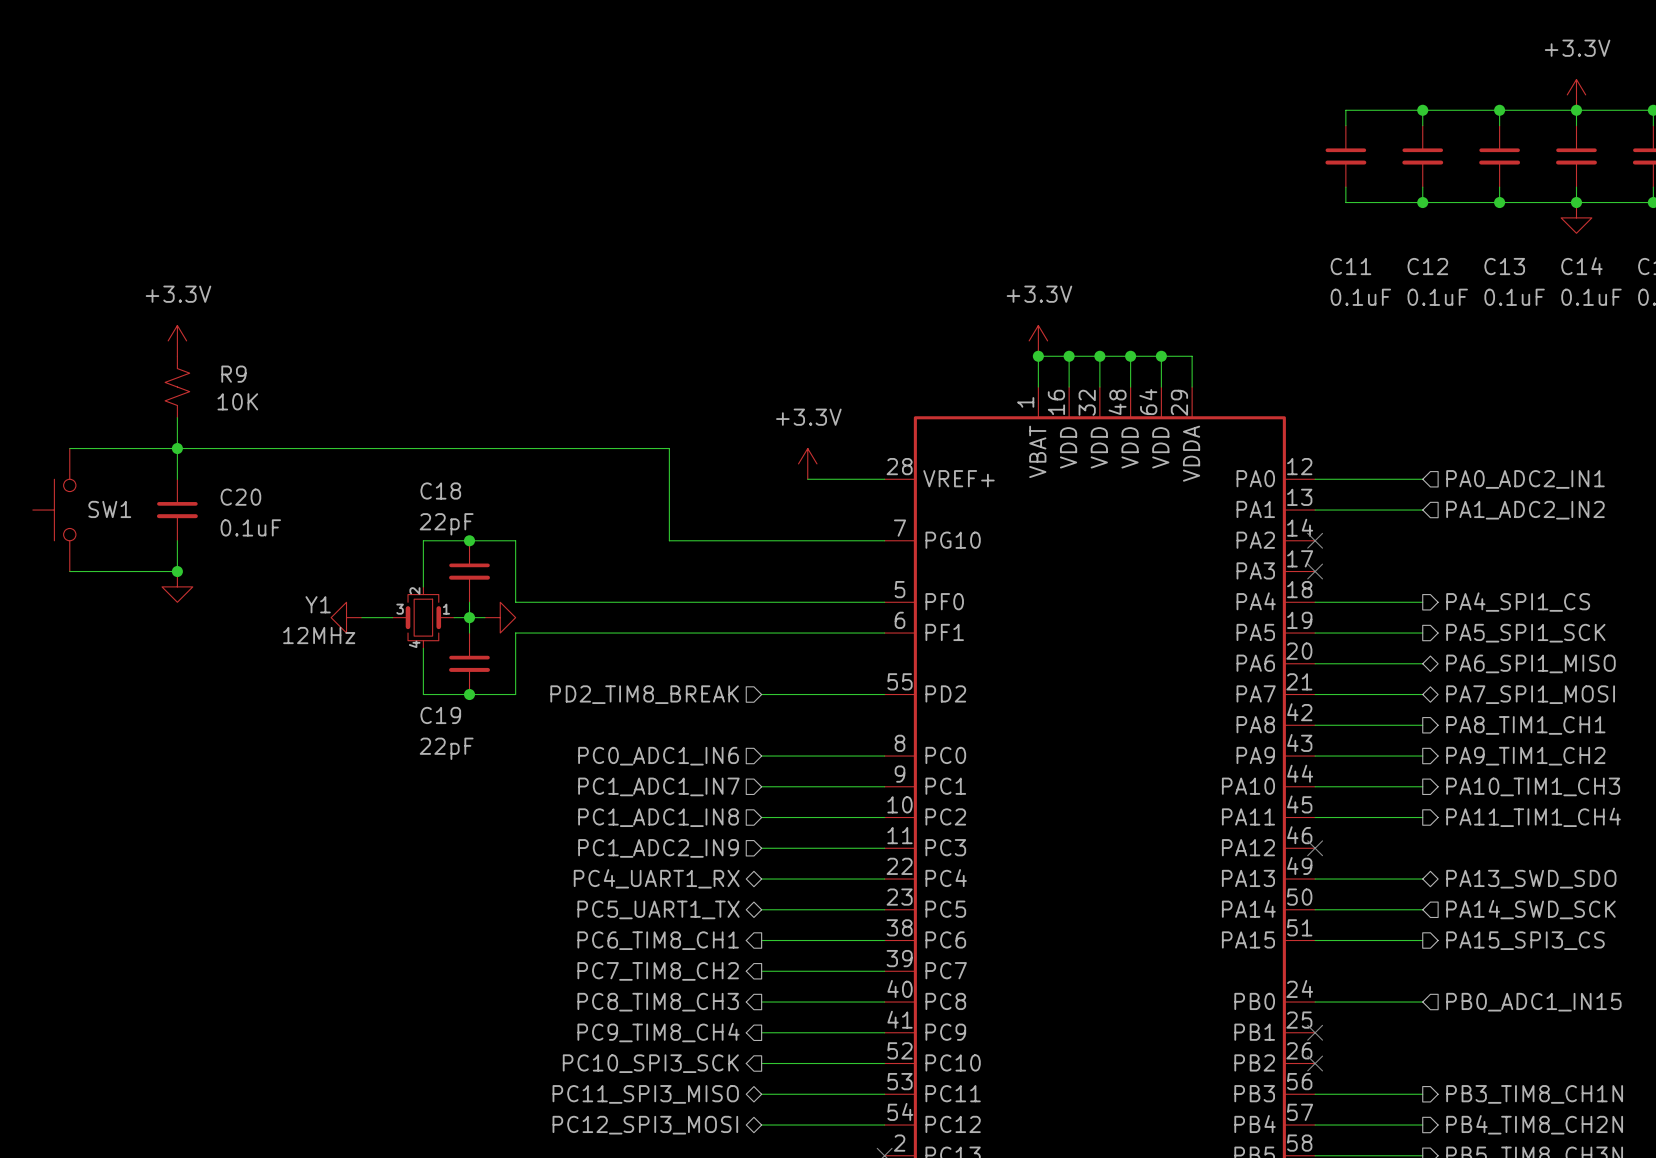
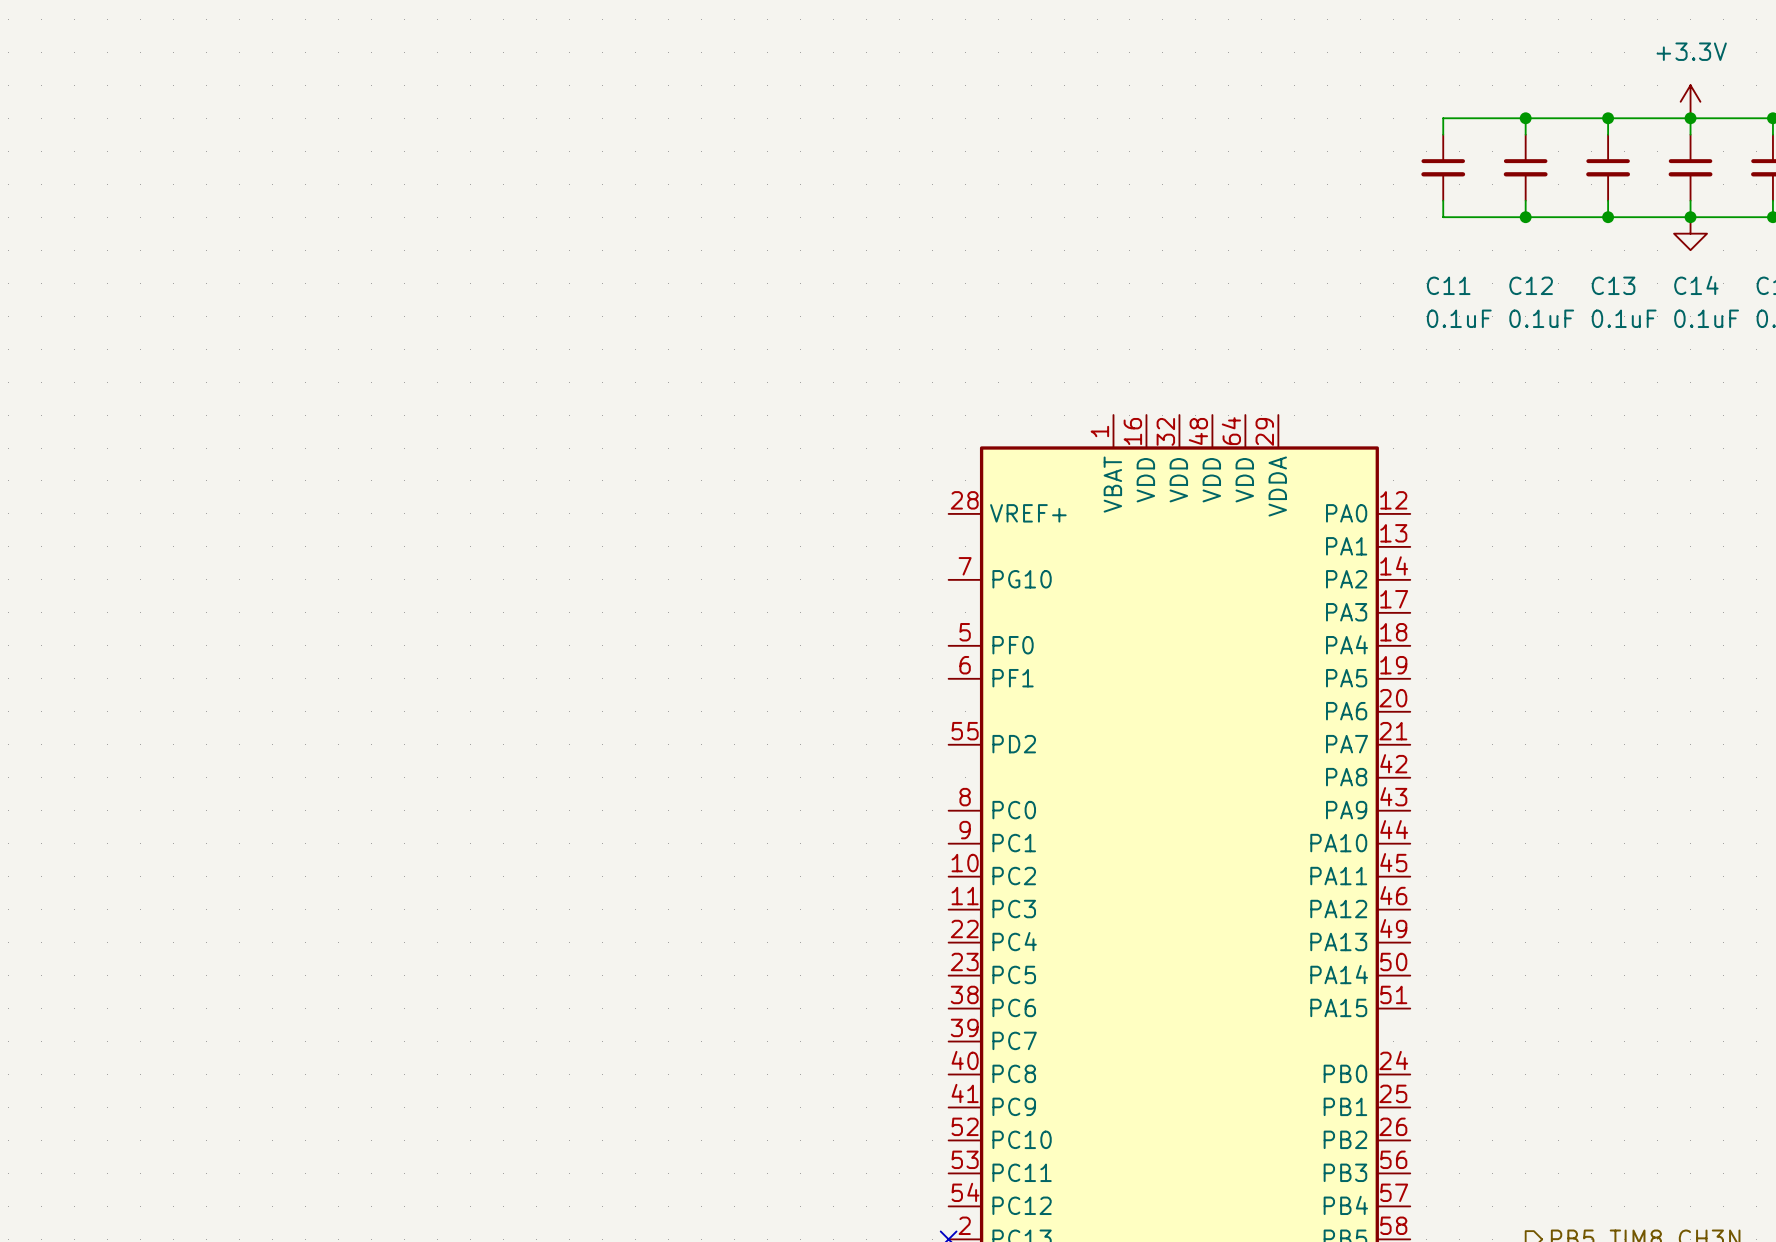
power symbol: +3.3V (177, 340) -> none
power symbol: +3.3V (1038, 340) -> none
junction: (1038, 356) -> none
wire: (1069, 356) (1069, 387) -> none
junction: (1069, 356) -> none
wire: (1099, 356) (1099, 387) -> none
junction: (1099, 356) -> none
wire: (1130, 356) (1130, 387) -> none
junction: (1130, 356) -> none
wire: (1161, 356) (1161, 387) -> none
junction: (1161, 356) -> none
R9: 10K (177, 387) -> none
wire: (1038, 387) (1038, 356) (1192, 356) (1192, 387) -> none
wire: (177, 417) (177, 479) -> none
wire: (69, 448) (669, 448) (669, 540) (884, 540) -> none
junction: (177, 448) -> none
power symbol: +3.3V (807, 463) -> none
wire: (807, 479) (884, 479) -> none
wire: (1315, 479) (1422, 479) -> none
hierarchical label: PA0_ADC2_IN1 (1525, 479) -> none
SW1: (54, 510) -> none
C20: 0.1uF (177, 510) -> none
wire: (1315, 510) (1422, 510) -> none
hierarchical label: PA1_ADC2_IN2 (1525, 510) -> none
wire: (177, 540) (177, 571) (69, 571) -> none
junction: (469, 540) -> none
no-connect mark: (1315, 540) -> none
junction: (177, 571) -> none
C18: 22pF (469, 571) -> none
no-connect mark: (1315, 571) -> none
power symbol: (177, 586) -> none
wire: (423, 586) (423, 540) (515, 540) (515, 602) (884, 602) -> none
wire: (469, 602) (469, 633) -> none
wire: (1315, 602) (1422, 602) -> none
hierarchical label: PA4_SPI1_CS (1518, 602) -> none
power symbol: (346, 617) -> none
wire: (361, 617) (392, 617) -> none
Y1: 12MHz (423, 617) -> none
wire: (454, 617) (484, 617) -> none
junction: (469, 617) -> none
power symbol: (500, 617) -> none
wire: (884, 633) (515, 633) (515, 694) (423, 694) (423, 648) -> none
wire: (1315, 633) (1422, 633) -> none
hierarchical label: PA5_SPI1_SCK (1525, 633) -> none
C19: 22pF (469, 663) -> none
wire: (1315, 663) (1422, 663) -> none
hierarchical label: PA6_SPI1_MISO (1530, 663) -> none
junction: (469, 694) -> none
hierarchical label: PD2_TIM8_BREAK (644, 694) -> none
wire: (761, 694) (884, 694) -> none
wire: (1315, 694) (1422, 694) -> none
hierarchical label: PA7_SPI1_MOSI (1530, 694) -> none
wire: (1315, 725) (1422, 725) -> none
hierarchical label: PA8_TIM1_CH1 (1525, 725) -> none
hierarchical label: PC0_ADC1_IN6 (658, 756) -> none
wire: (761, 756) (884, 756) -> none
wire: (1315, 756) (1422, 756) -> none
hierarchical label: PA9_TIM1_CH2 (1525, 756) -> none
hierarchical label: PC1_ADC1_IN7 (658, 786) -> none
wire: (761, 786) (884, 786) -> none
wire: (1315, 786) (1422, 786) -> none
hierarchical label: PA10_TIM1_CH3 (1533, 786) -> none
hierarchical label: PC1_ADC1_IN8 (658, 817) -> none
wire: (761, 817) (884, 817) -> none
wire: (1315, 817) (1422, 817) -> none
hierarchical label: PA11_TIM1_CH4 (1533, 817) -> none
hierarchical label: PC1_ADC2_IN9 (658, 848) -> none
wire: (761, 848) (884, 848) -> none
no-connect mark: (1315, 848) -> none
hierarchical label: PC4_UART1_RX (656, 878) -> none
wire: (761, 879) (884, 879) -> none
wire: (1315, 879) (1422, 879) -> none
hierarchical label: PA13_SWD_SDO (1531, 879) -> none
hierarchical label: PC5_UART1_TX (658, 909) -> none
wire: (761, 909) (884, 909) -> none
wire: (1315, 909) (1422, 909) -> none
hierarchical label: PA14_SWD_SCK (1530, 909) -> none
hierarchical label: PC6_TIM8_CH1 (658, 940) -> none
wire: (761, 940) (884, 940) -> none
wire: (1315, 940) (1422, 940) -> none
hierarchical label: PA15_SPI3_CS (1525, 940) -> none
hierarchical label: PC7_TIM8_CH2 (658, 971) -> none
wire: (761, 971) (884, 971) -> none
hierarchical label: PC8_TIM8_CH3 (658, 1002) -> none
wire: (761, 1002) (884, 1002) -> none
wire: (1315, 1002) (1422, 1002) -> none
hierarchical label: PB0_ADC1_IN15 (1533, 1002) -> none
hierarchical label: PC9_TIM8_CH4 (658, 1032) -> none
wire: (761, 1032) (884, 1032) -> none
no-connect mark: (1315, 1032) -> none
hierarchical label: PC10_SPI3_SCK (650, 1063) -> none
wire: (761, 1063) (884, 1063) -> none
no-connect mark: (1315, 1063) -> none
hierarchical label: PC11_SPI3_MISO (645, 1094) -> none
wire: (761, 1094) (884, 1094) -> none
wire: (1315, 1094) (1422, 1094) -> none
hierarchical label: PB3_TIM8_CH1N (1534, 1094) -> none
hierarchical label: PB4_TIM8_CH2N (1534, 1124) -> none
hierarchical label: PC12_SPI3_MOSI (645, 1125) -> none
wire: (761, 1125) (884, 1125) -> none
wire: (1315, 1125) (1422, 1125) -> none
wire: (1315, 1155) (1422, 1155) -> none

